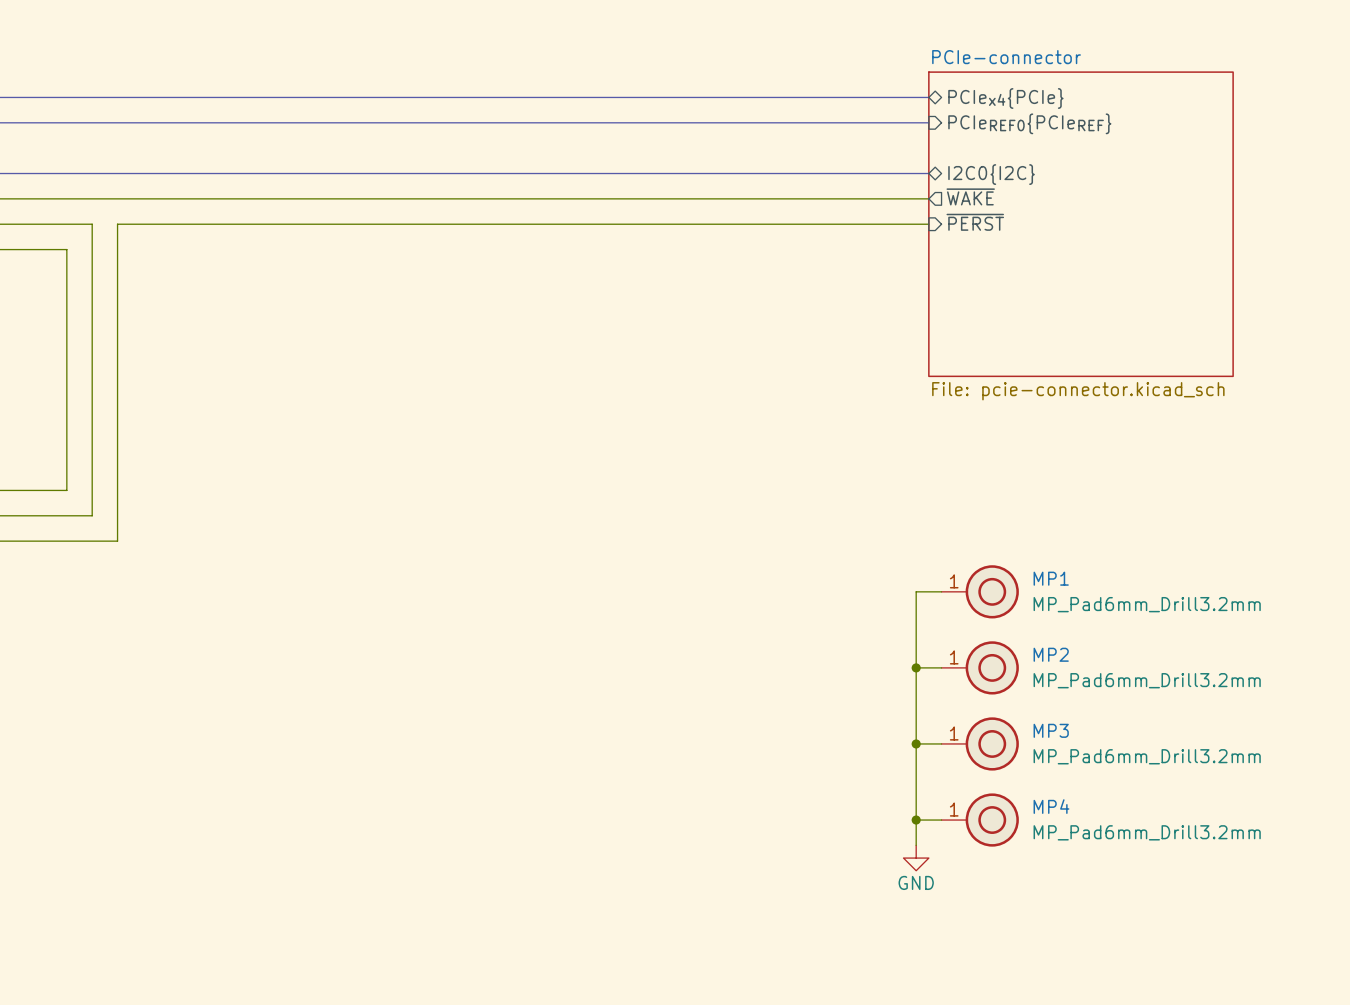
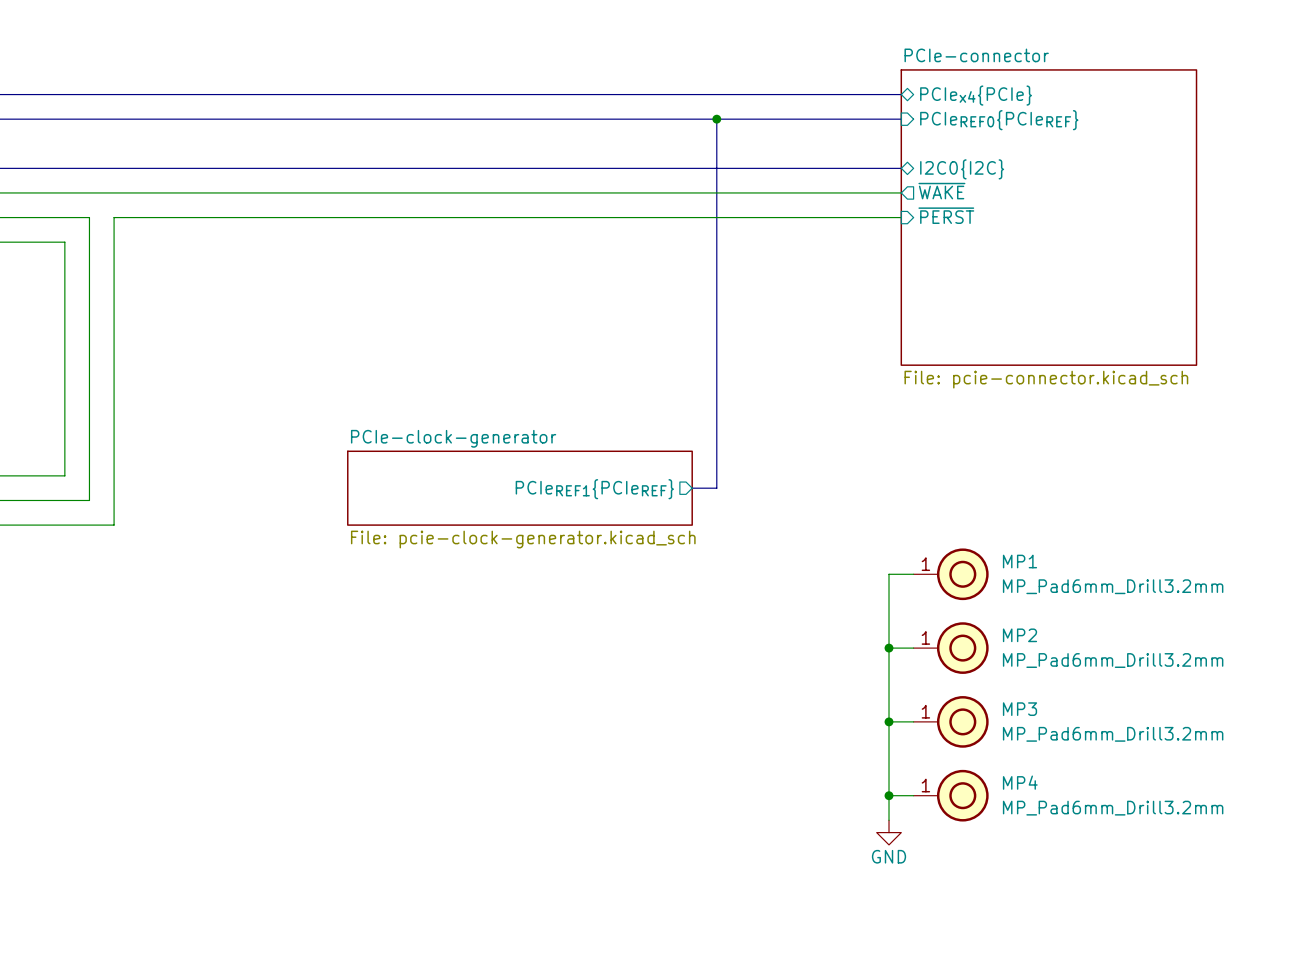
bus: none -> (716, 119) (716, 488) (692, 488)
junction: none -> (716, 119)
sheet PCIe-clock-generator: none -> File: pcie-clock-generator.kicad_sch (519, 488)
sheet pin: none -> PCIeREF1{PCIeREF} (594, 489)

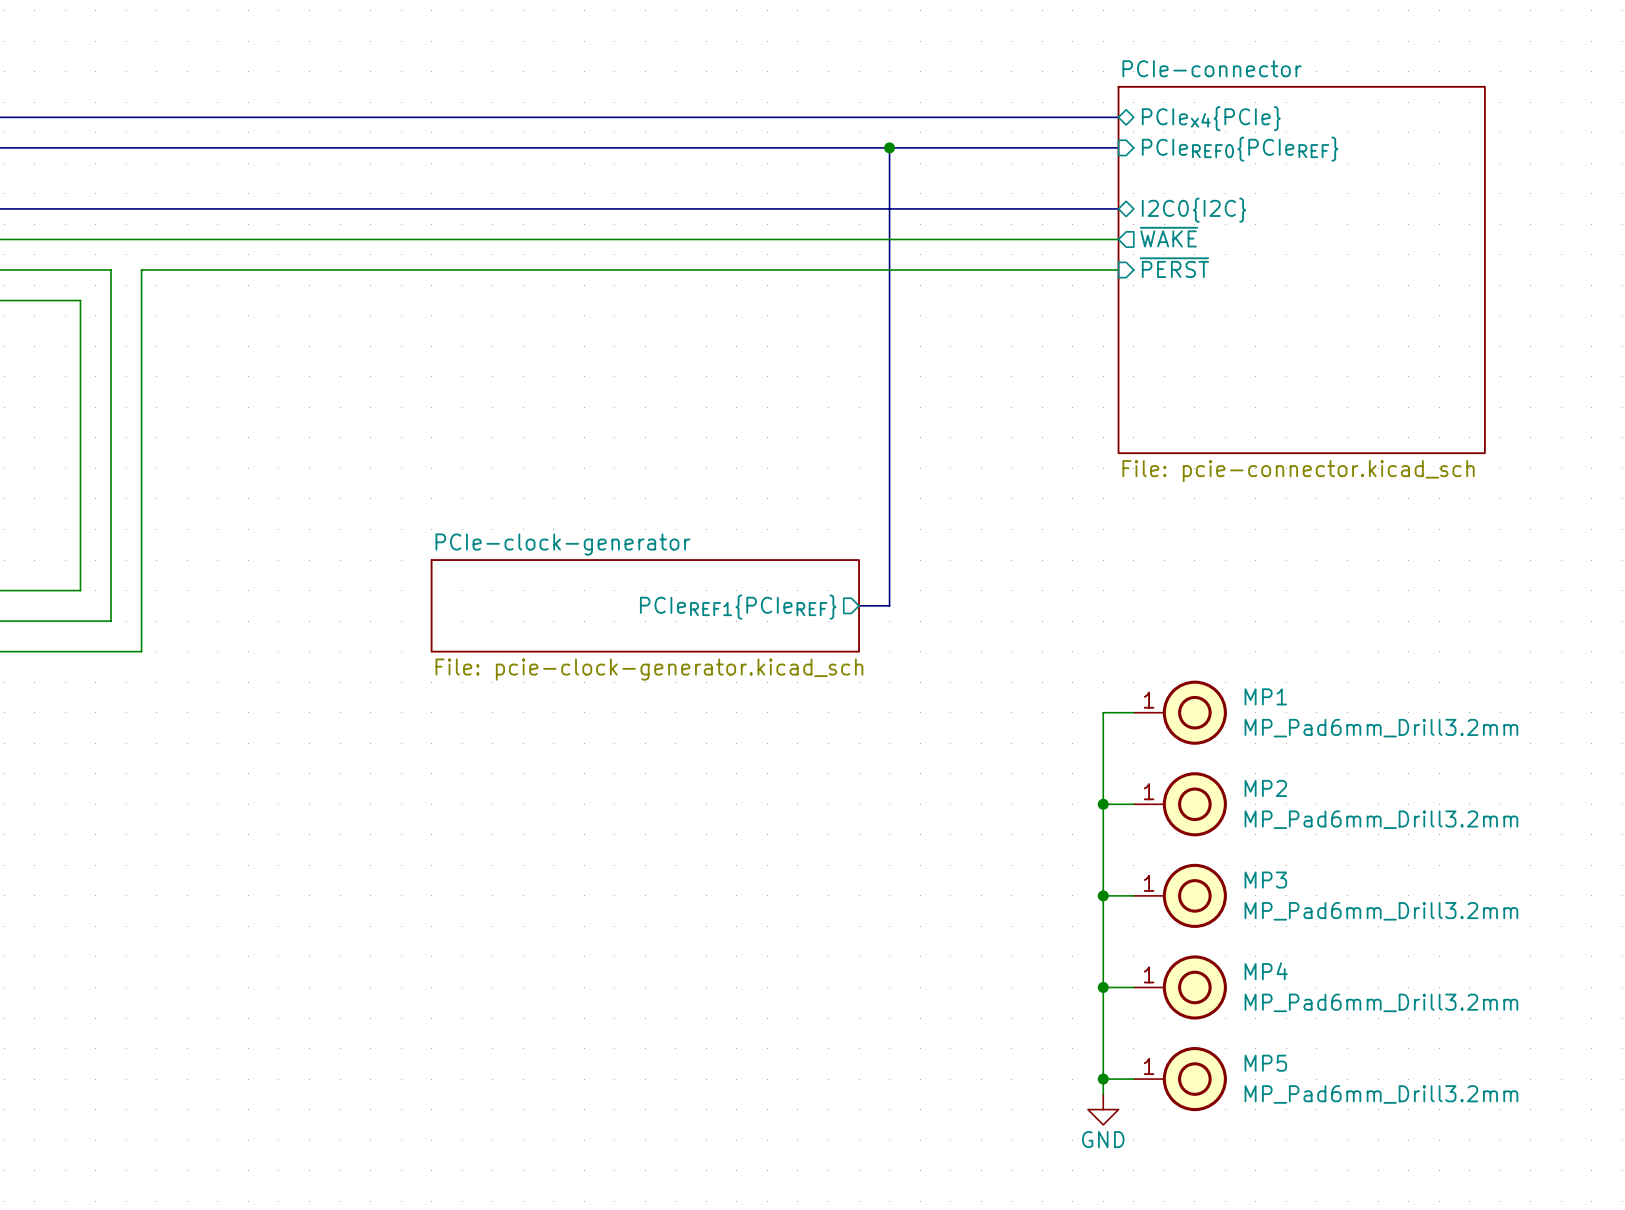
wire: none -> (1103, 1018) (1103, 1094)
power symbol position: GND (889, 832) -> GND (1103, 1109)
wire: none -> (1103, 1079) (1133, 1079)
junction: none -> (1103, 1079)
MP5: none -> MP_Pad6mm_Drill3.2mm (1180, 1079)

